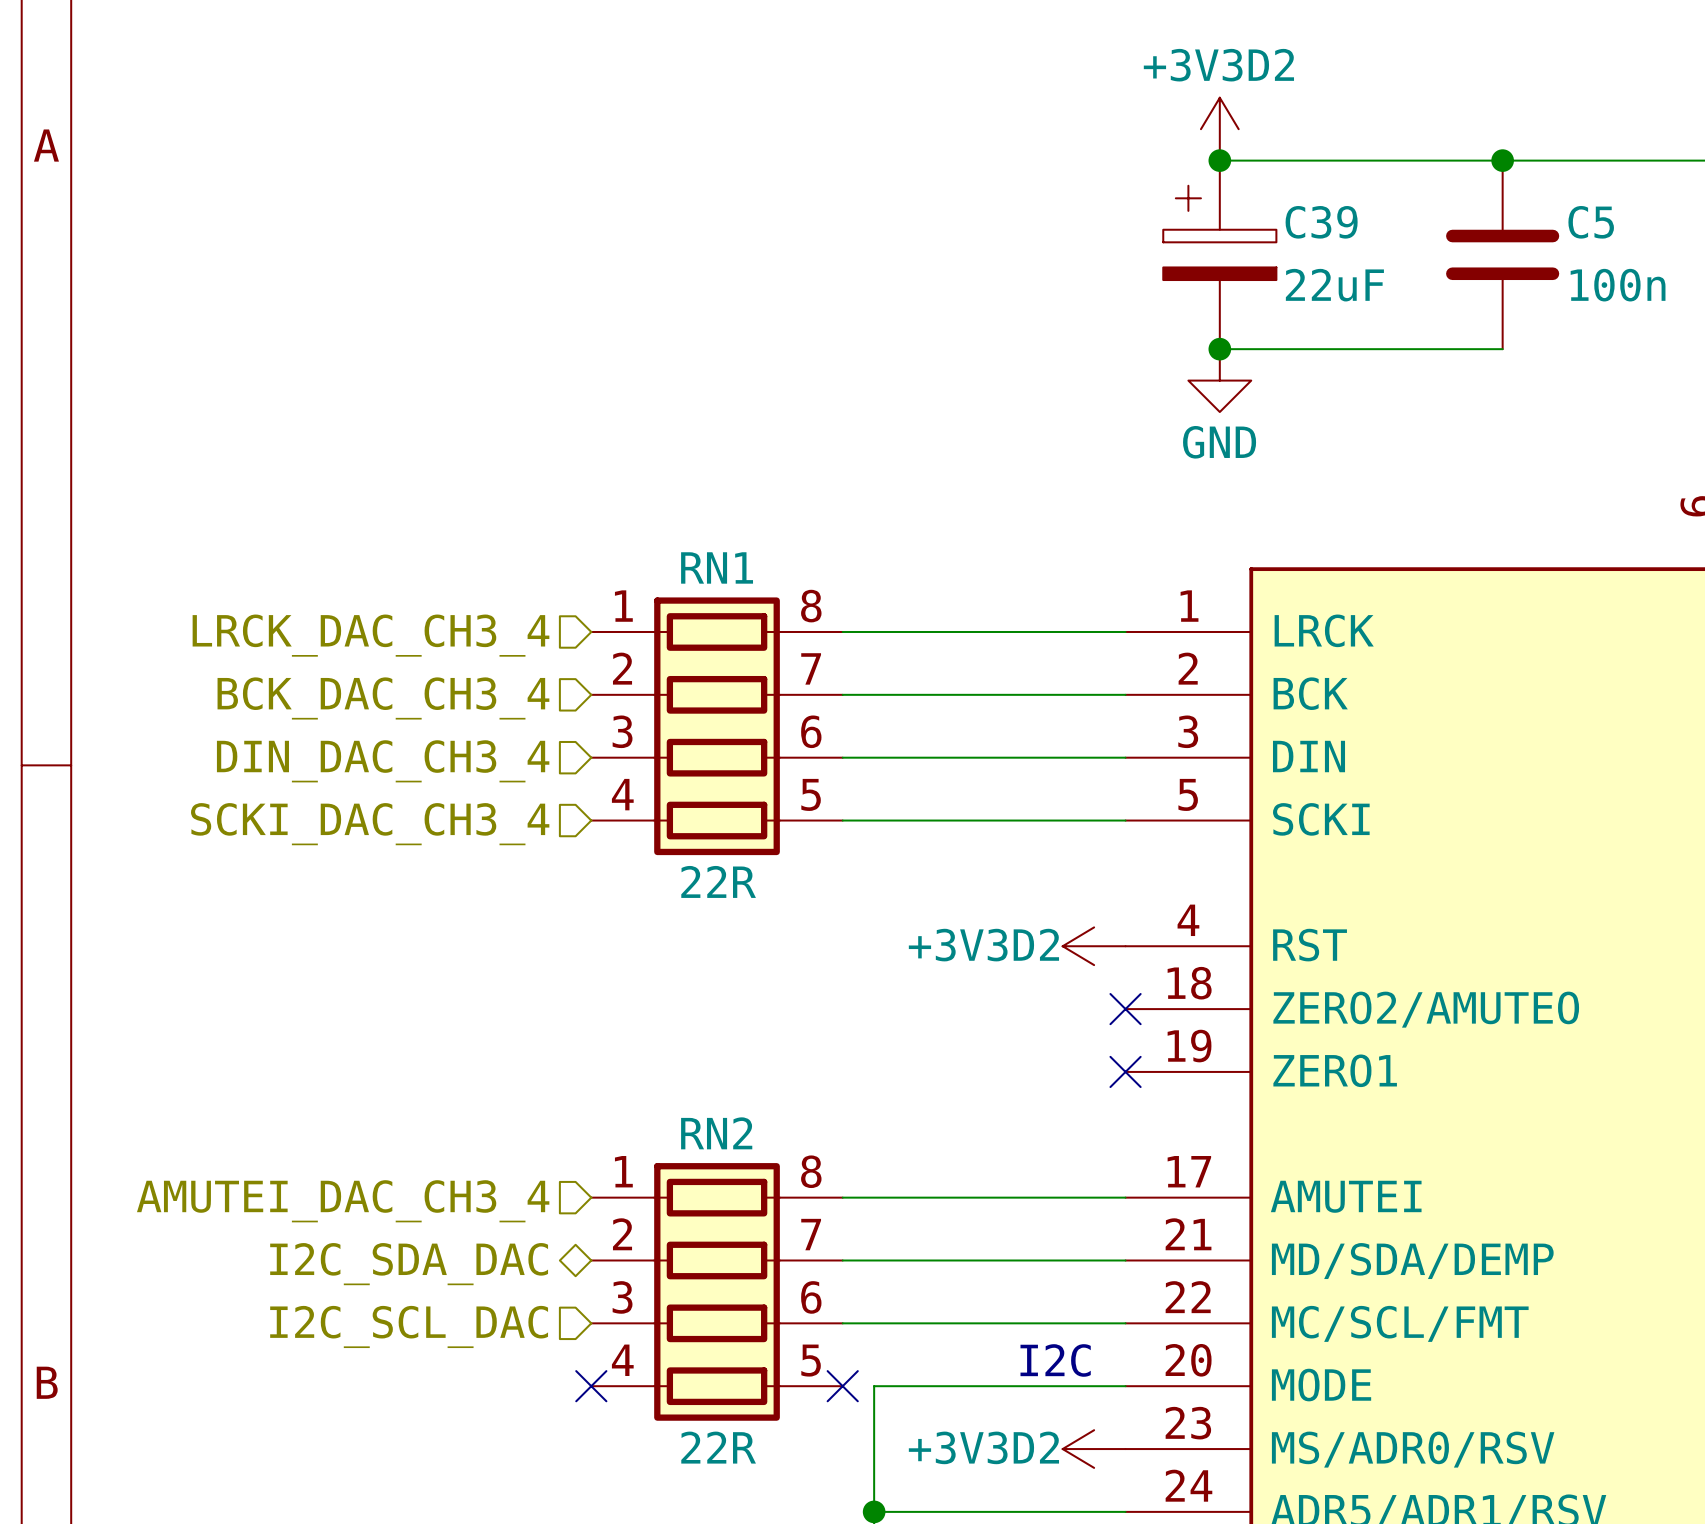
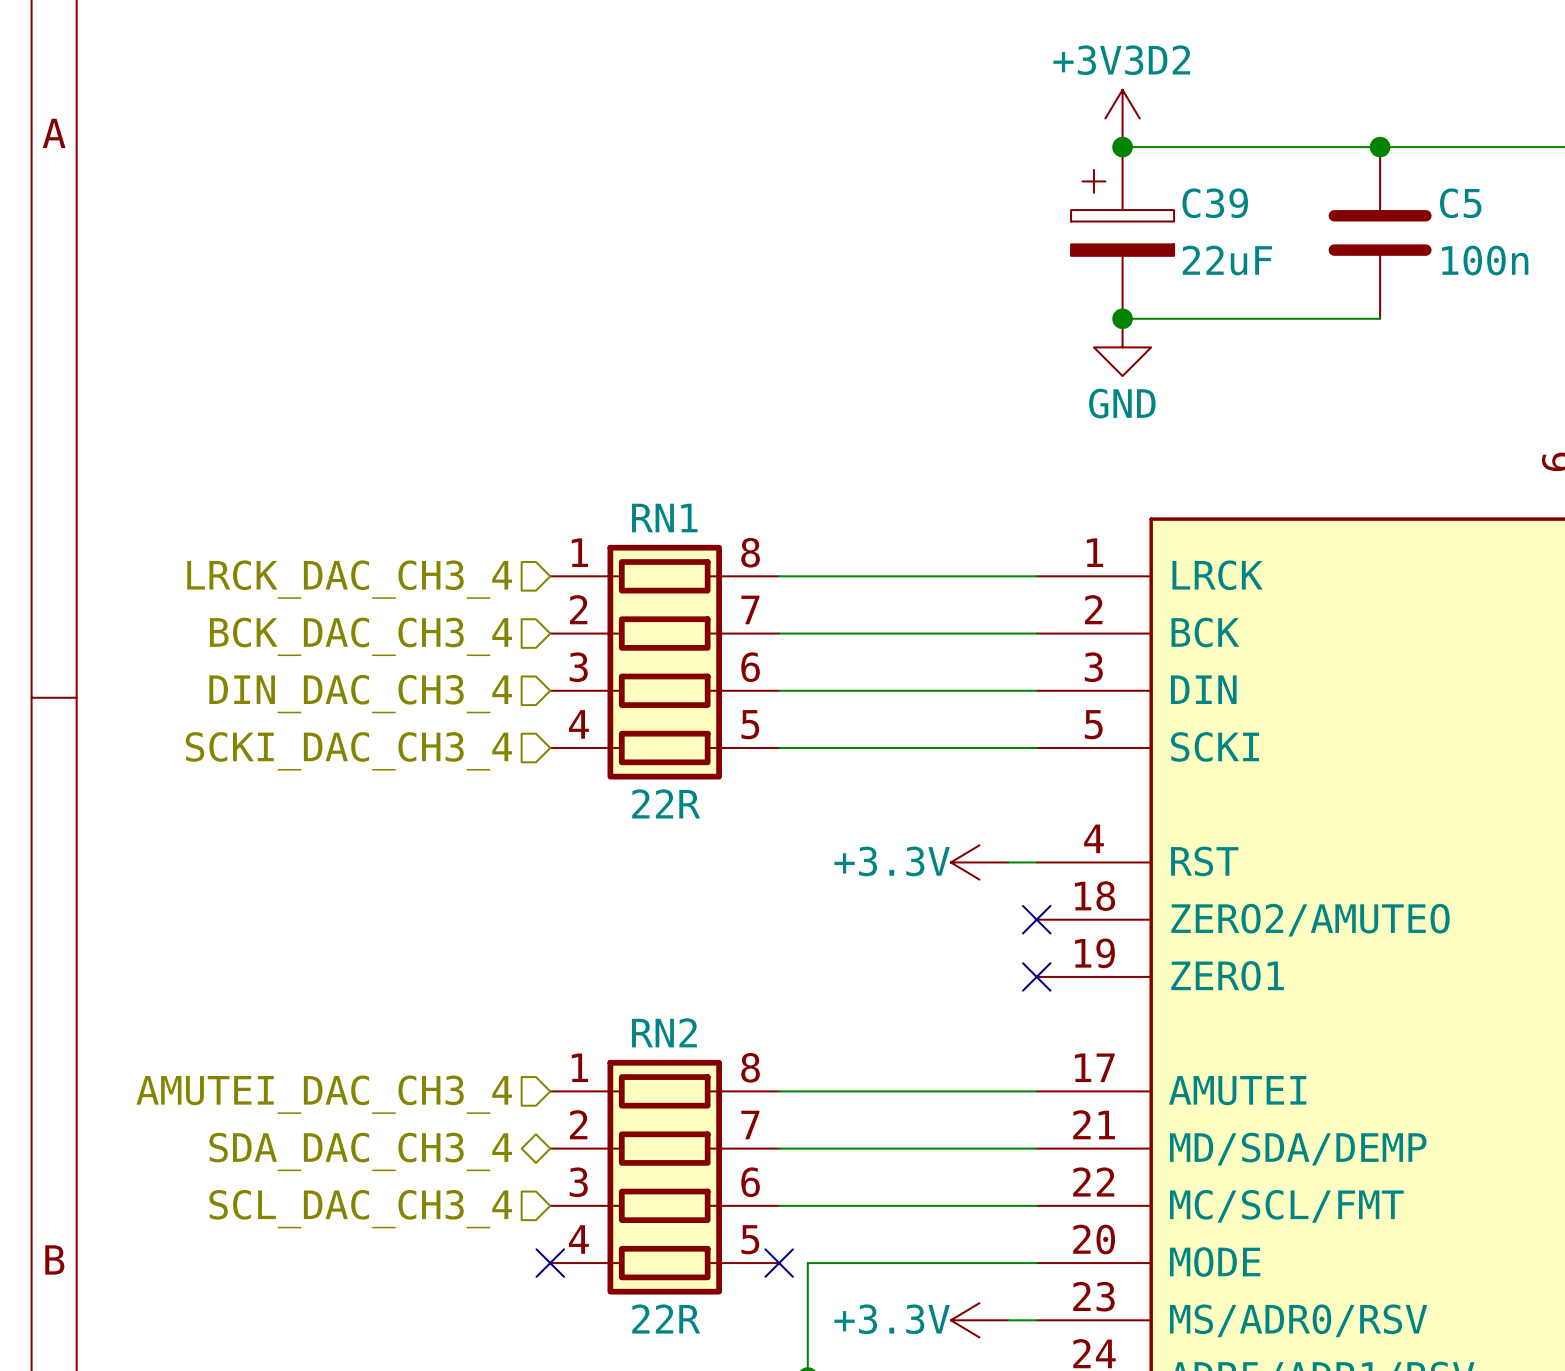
power symbol: none -> +3.3V (979, 862)
power symbol: +3V3D2 (1094, 946) -> none
hierarchical label: I2C_SDA_DAC (409, 1264) -> SDA_DAC_CH3_4 (360, 1151)
hierarchical label: I2C_SCL_DAC (409, 1326) -> SCL_DAC_CH3_4 (360, 1209)
text: I2C (1055, 1360) -> none
power symbol: none -> +3.3V (979, 1320)
power symbol: +3V3D2 (1094, 1449) -> none

